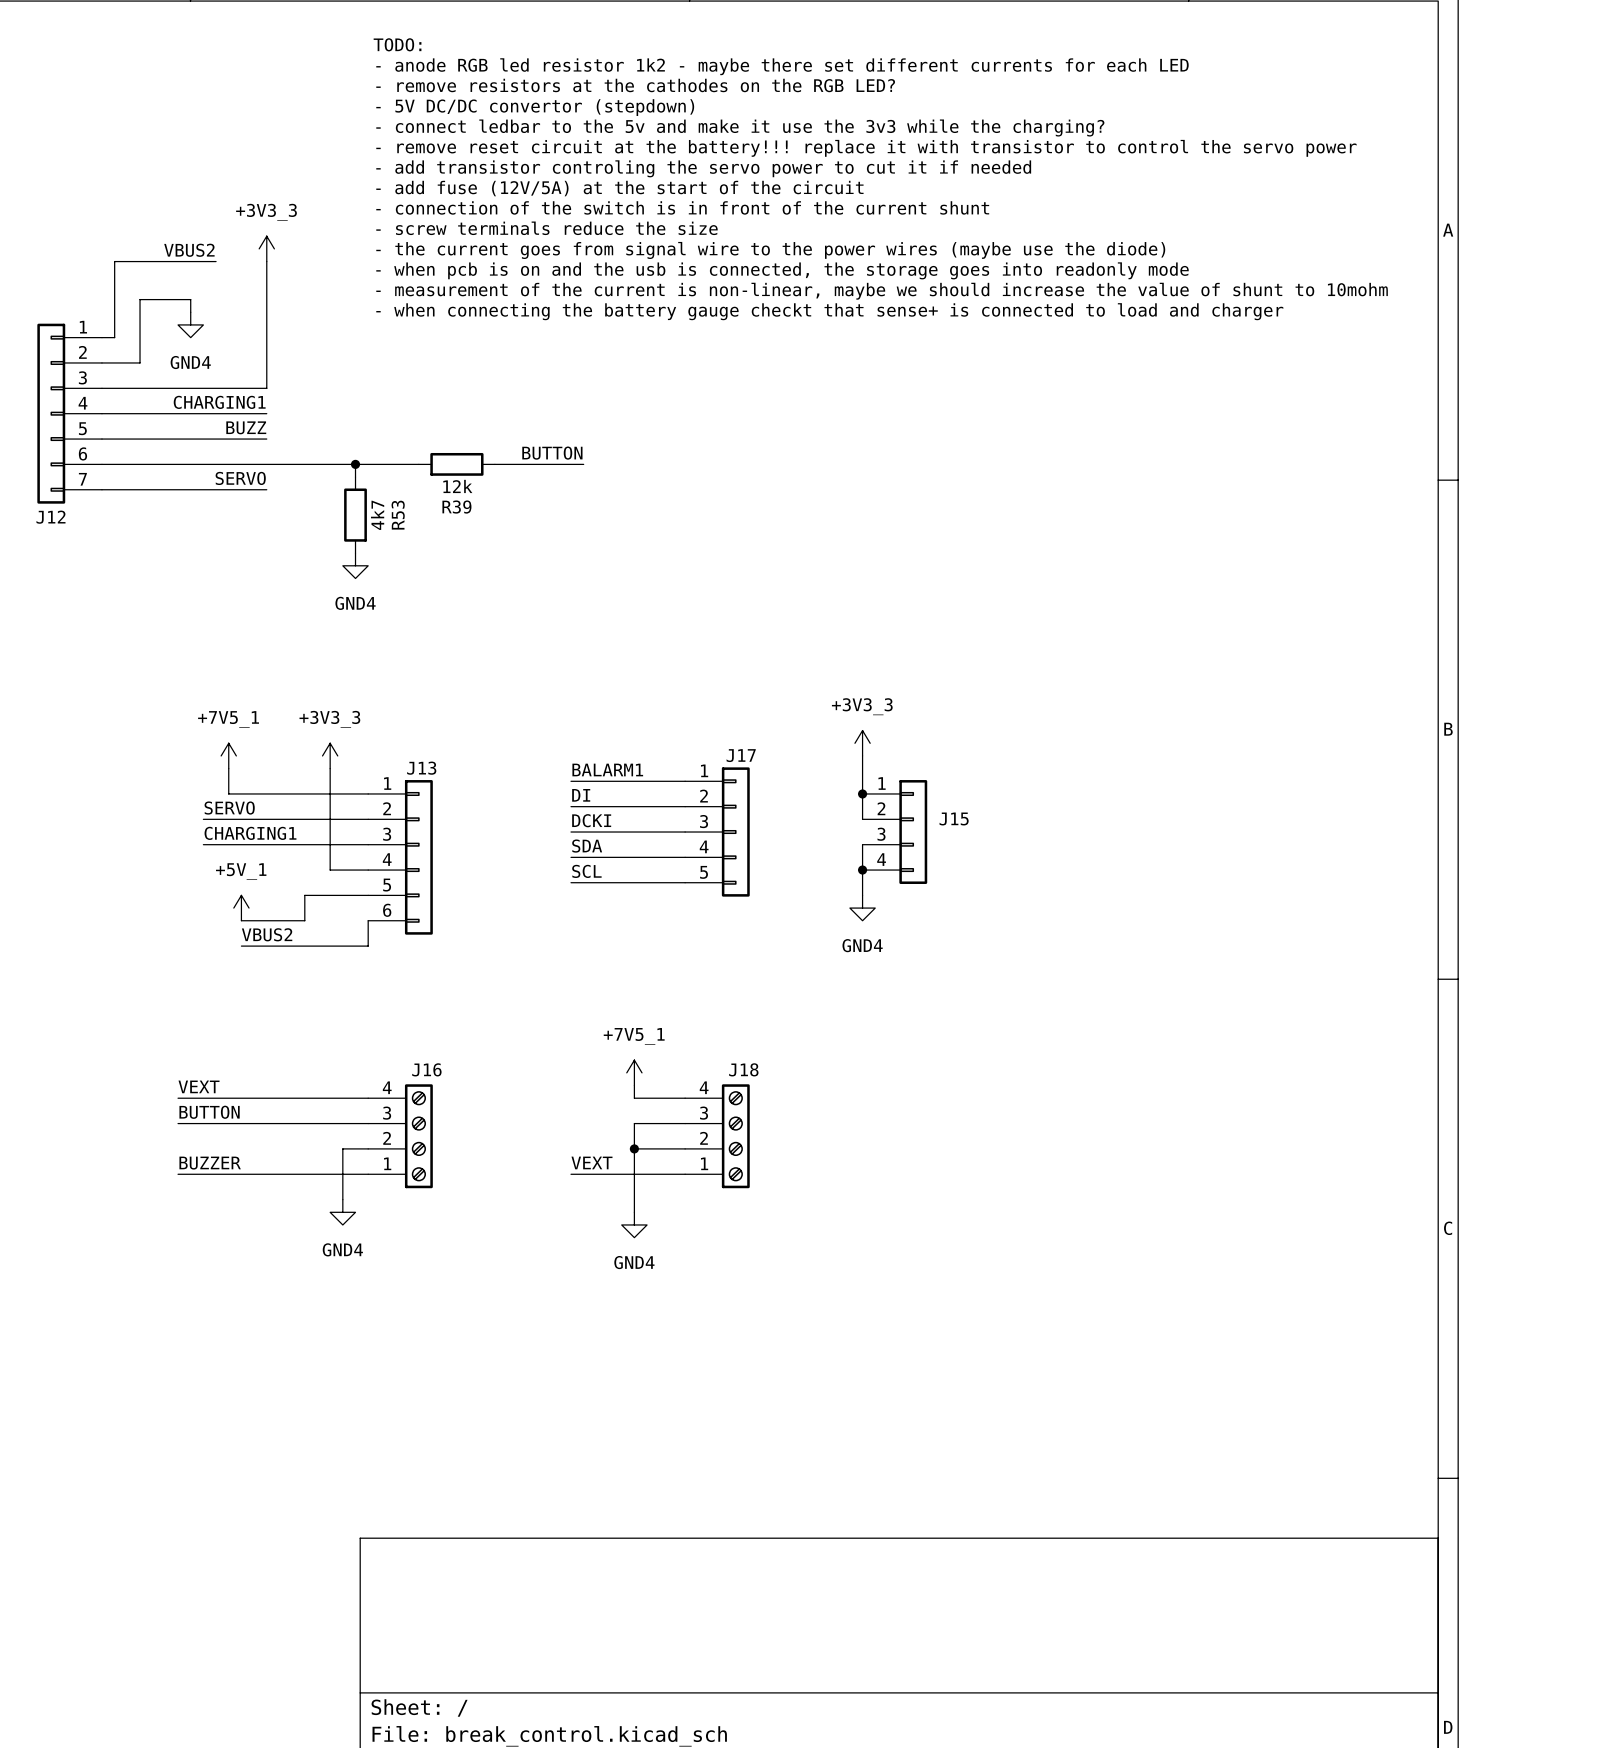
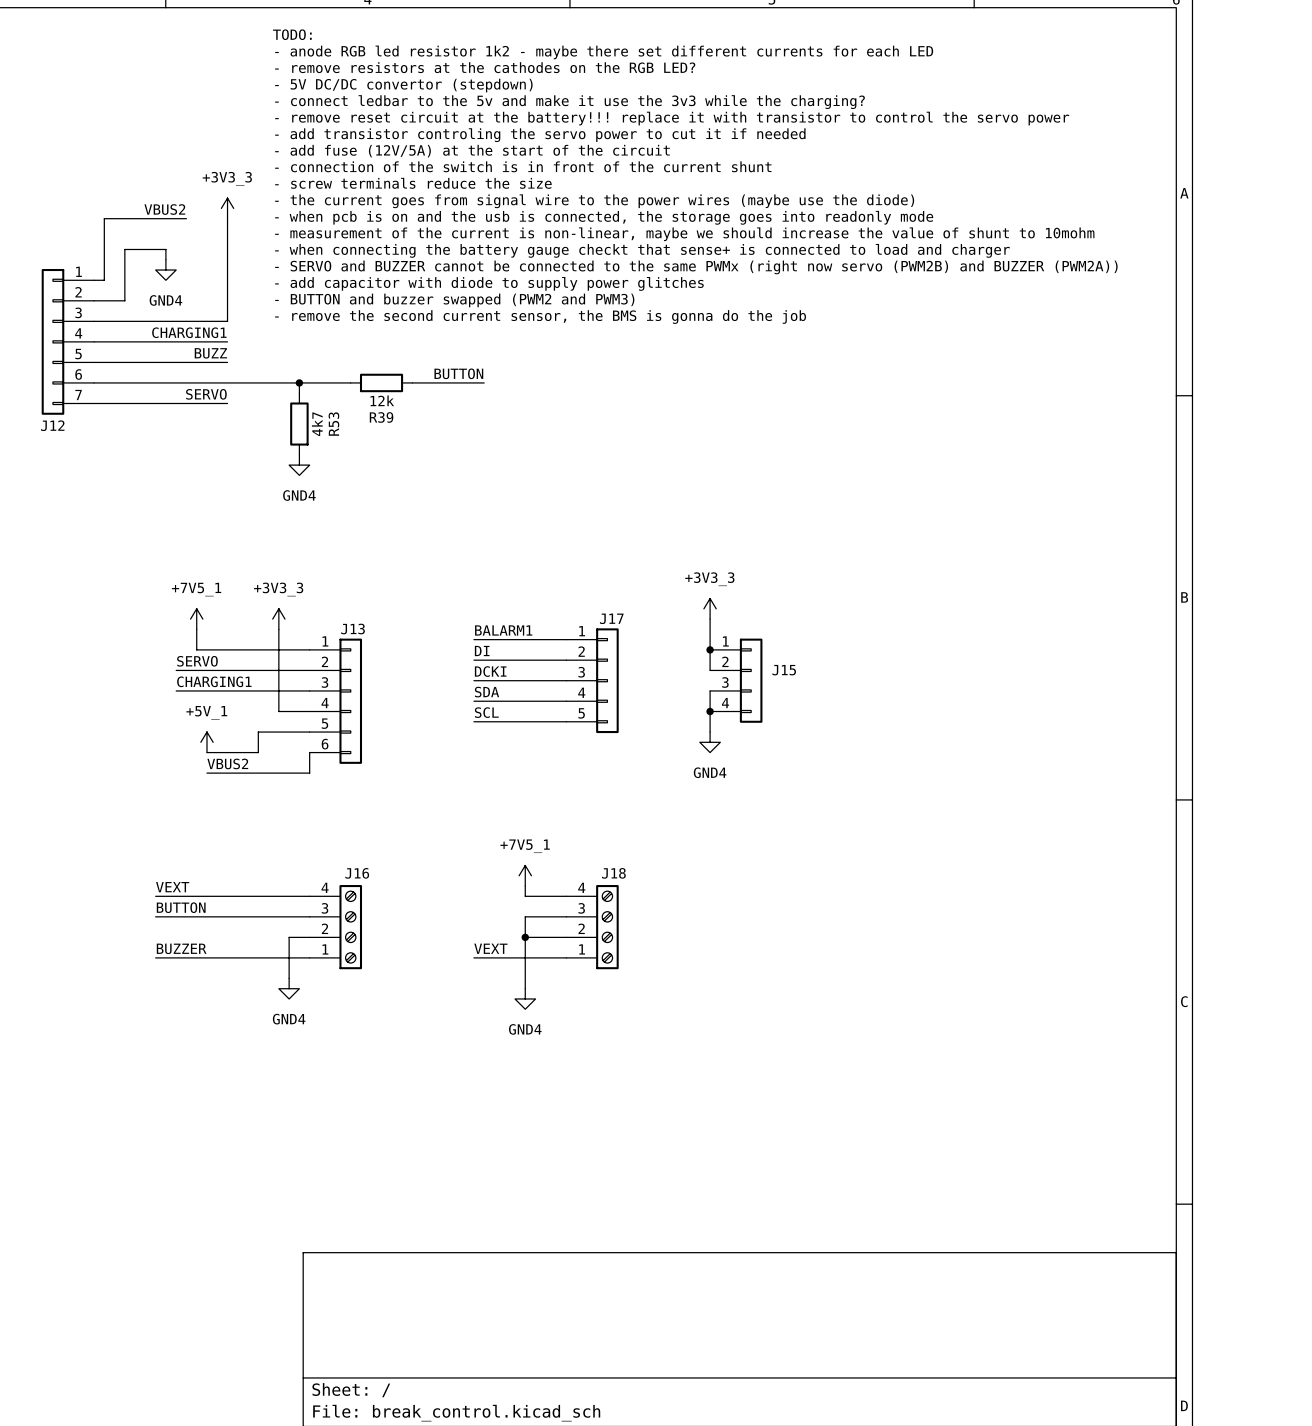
text position: TODO: (397, 44) -> TODO: (292, 34)
text position: - anode RGB led resistor 1k2 - maybe there set different currents for each LED (782, 66) -> - anode RGB led resistor 1k2 - maybe there set different currents for each LED (604, 52)
text position: - remove resistors at the cathodes on the RGB LED? (635, 85) -> - remove resistors at the cathodes on the RGB LED? (485, 67)
text position: - 5V DC/DC convertor (stepdown) (535, 107) -> - 5V DC/DC convertor (stepdown) (403, 85)
text position: - connect ledbar to the 5v and make it use the 3v3 while the charging? (740, 128) -> - connect ledbar to the 5v and make it use the 3v3 while the charging? (570, 102)
text position: - remove reset circuit at the battery!!! replace it with transistor to control the servo power (866, 148) -> - remove reset circuit at the battery!!! replace it with transistor to control the servo power (672, 118)
text position: - add transistor controling the servo power to cut it if needed (703, 168) -> - add transistor controling the servo power to cut it if needed (540, 135)
text position: - add fuse (12V/5A) at the start of the circuit (619, 188) -> - add fuse (12V/5A) at the start of the circuit (472, 151)
text position: - connection of the switch is in front of the current shunt (682, 207) -> - connection of the switch is in front of the current shunt (523, 166)
text position: - screw terminals reduce the size (546, 228) -> - screw terminals reduce the size (413, 183)
text position: - the current goes from signal wire to the power wires (maybe use the diode) (770, 250) -> - the current goes from signal wire to the power wires (maybe use the diode) (594, 201)
text position: - when pcb is on and the usb is connected, the storage goes into readonly mode (782, 270) -> - when pcb is on and the usb is connected, the storage goes into readonly mode (604, 217)
text position: - measurement of the current is non-linear, maybe we should increase the value of shunt to 10mohm (882, 291) -> - measurement of the current is non-linear, maybe we should increase the value of shunt to 10mohm (684, 234)
text position: - when connecting the battery gauge checkt that sense+ is connected to load and charger (829, 311) -> - when connecting the battery gauge checkt that sense+ is connected to load and charger (642, 250)
text: none -> - SERVO and BUZZER cannot be connected to the same PWMx (right now servo (PWM2B) and BUZZER (PWM2A)) (696, 267)
text: none -> - add capacitor with diode to supply power glitches (489, 283)
text: none -> - BUTTON and buzzer swapped (PWM2 and PWM3) (454, 300)
text: none -> - remove the second current sensor, the BMS is gonna do the job (540, 317)

